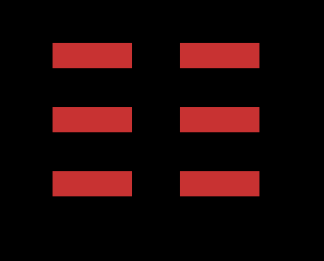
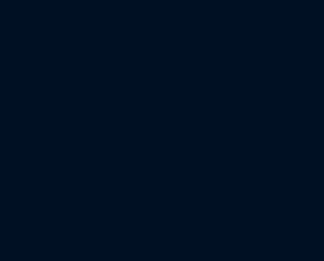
part: (155, 119) -> none

